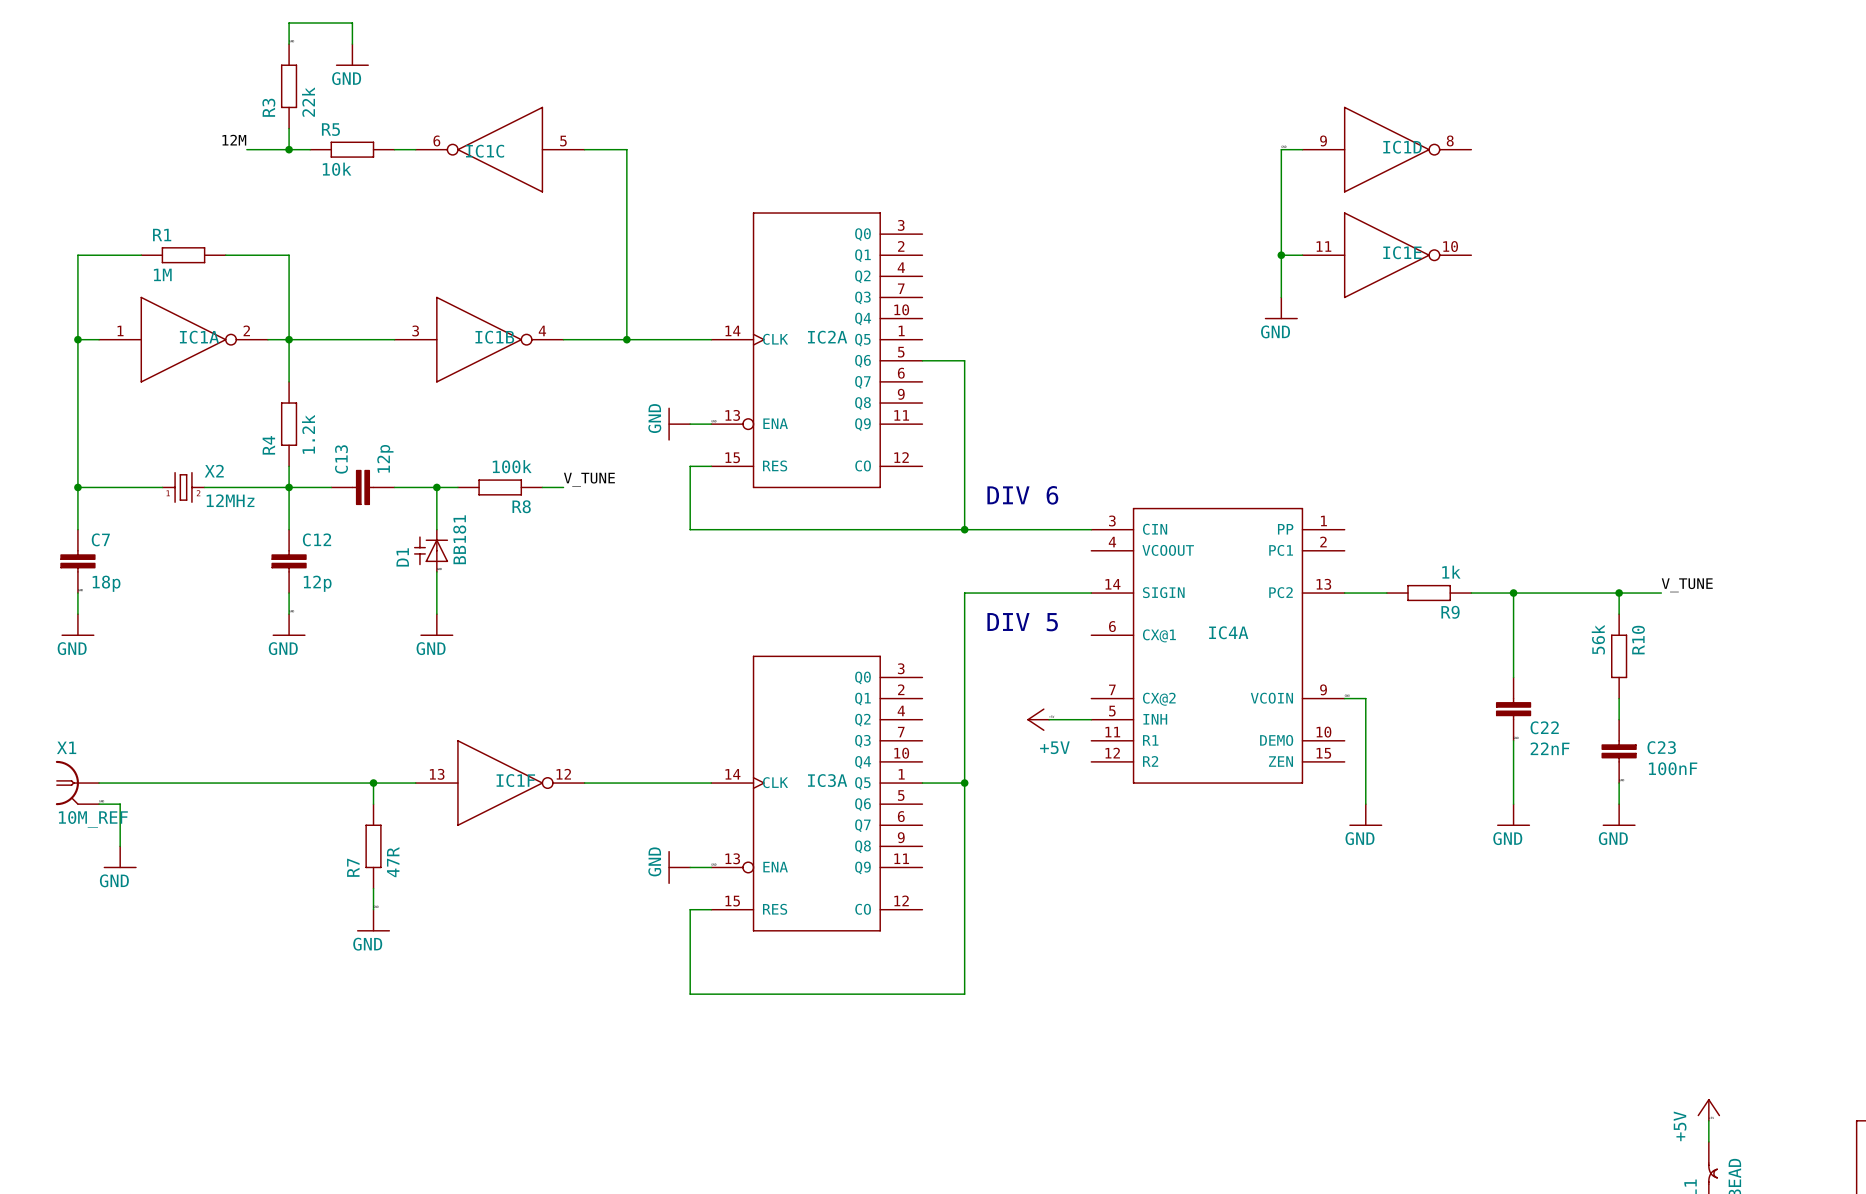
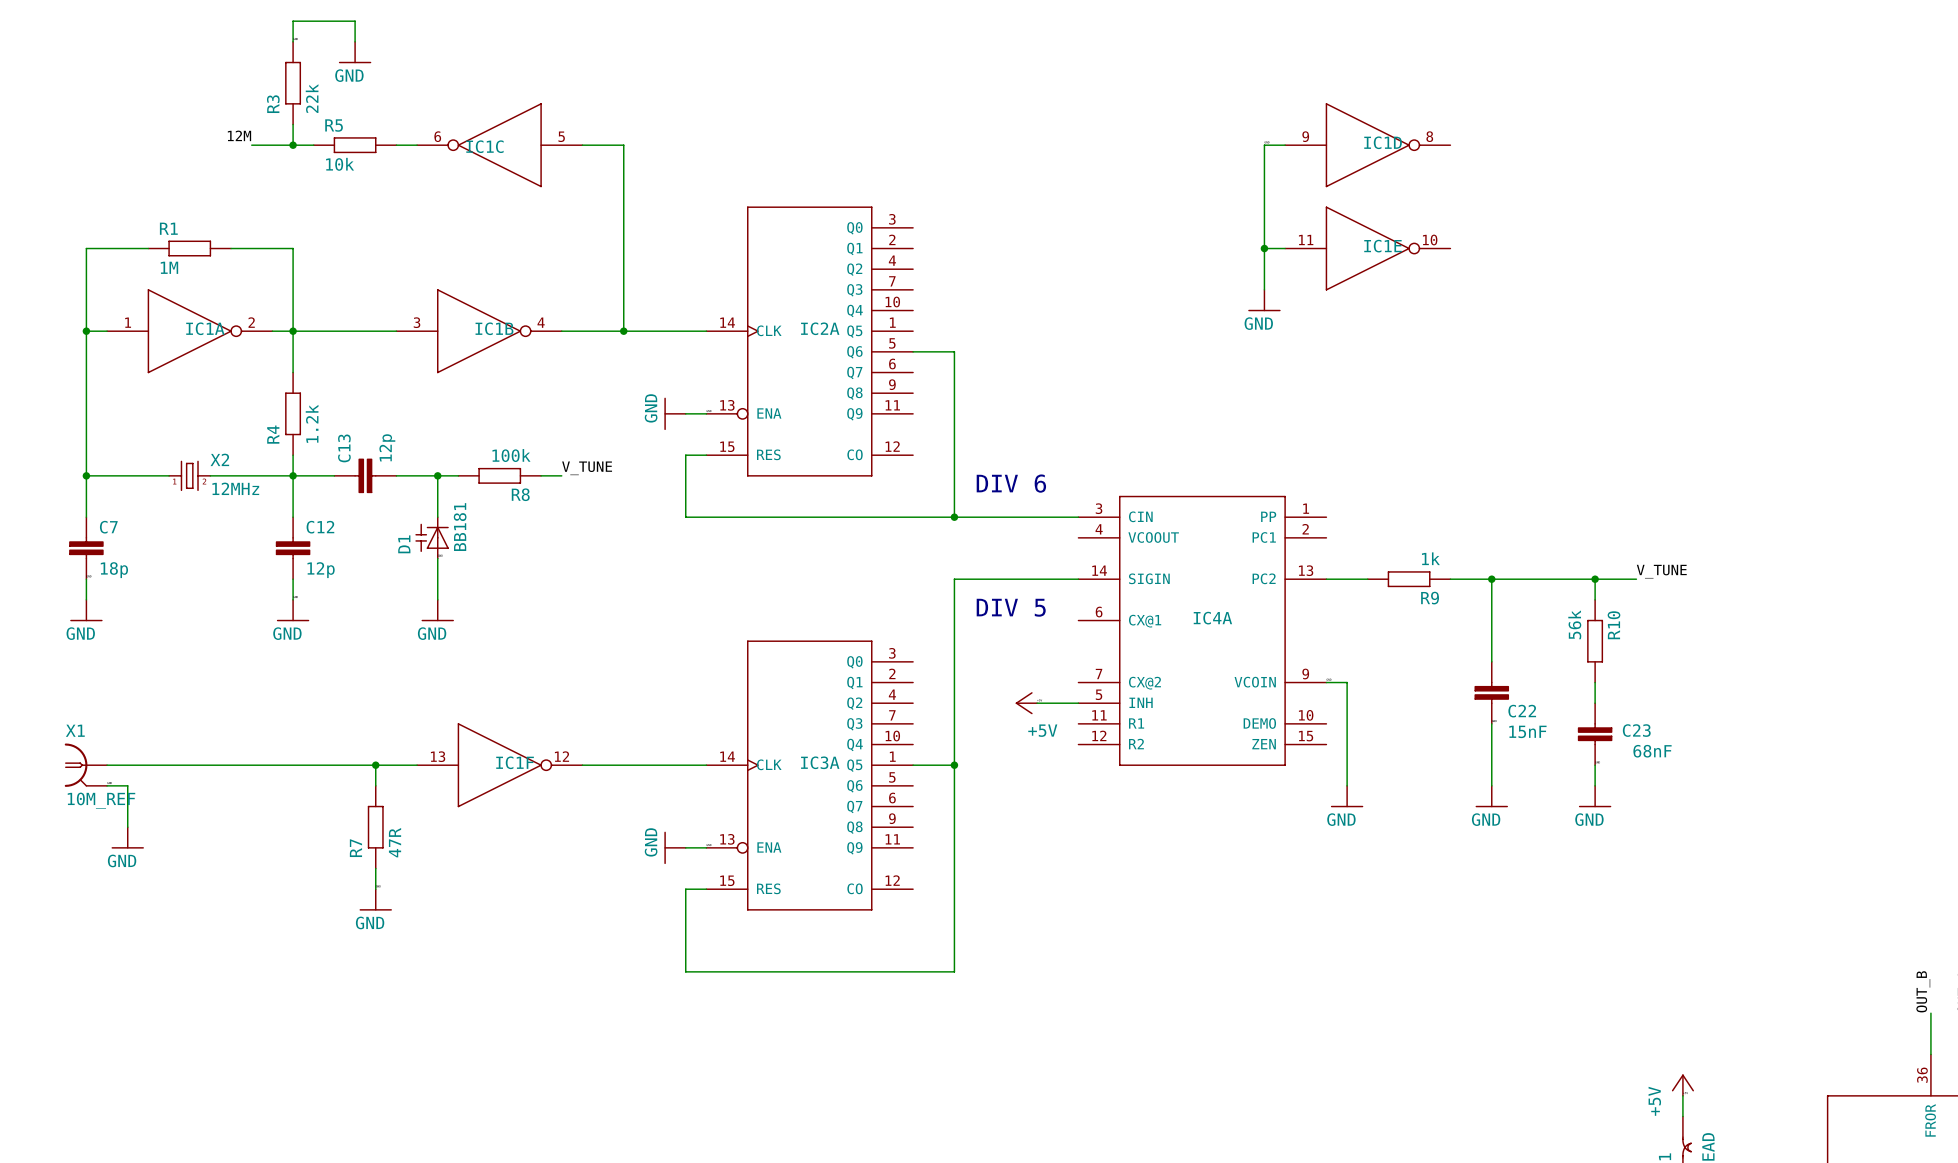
C22 value: 22nF (1550, 748) -> 15nF (1527, 731)
C23 value: 100nF (1673, 768) -> 68nF (1652, 751)

